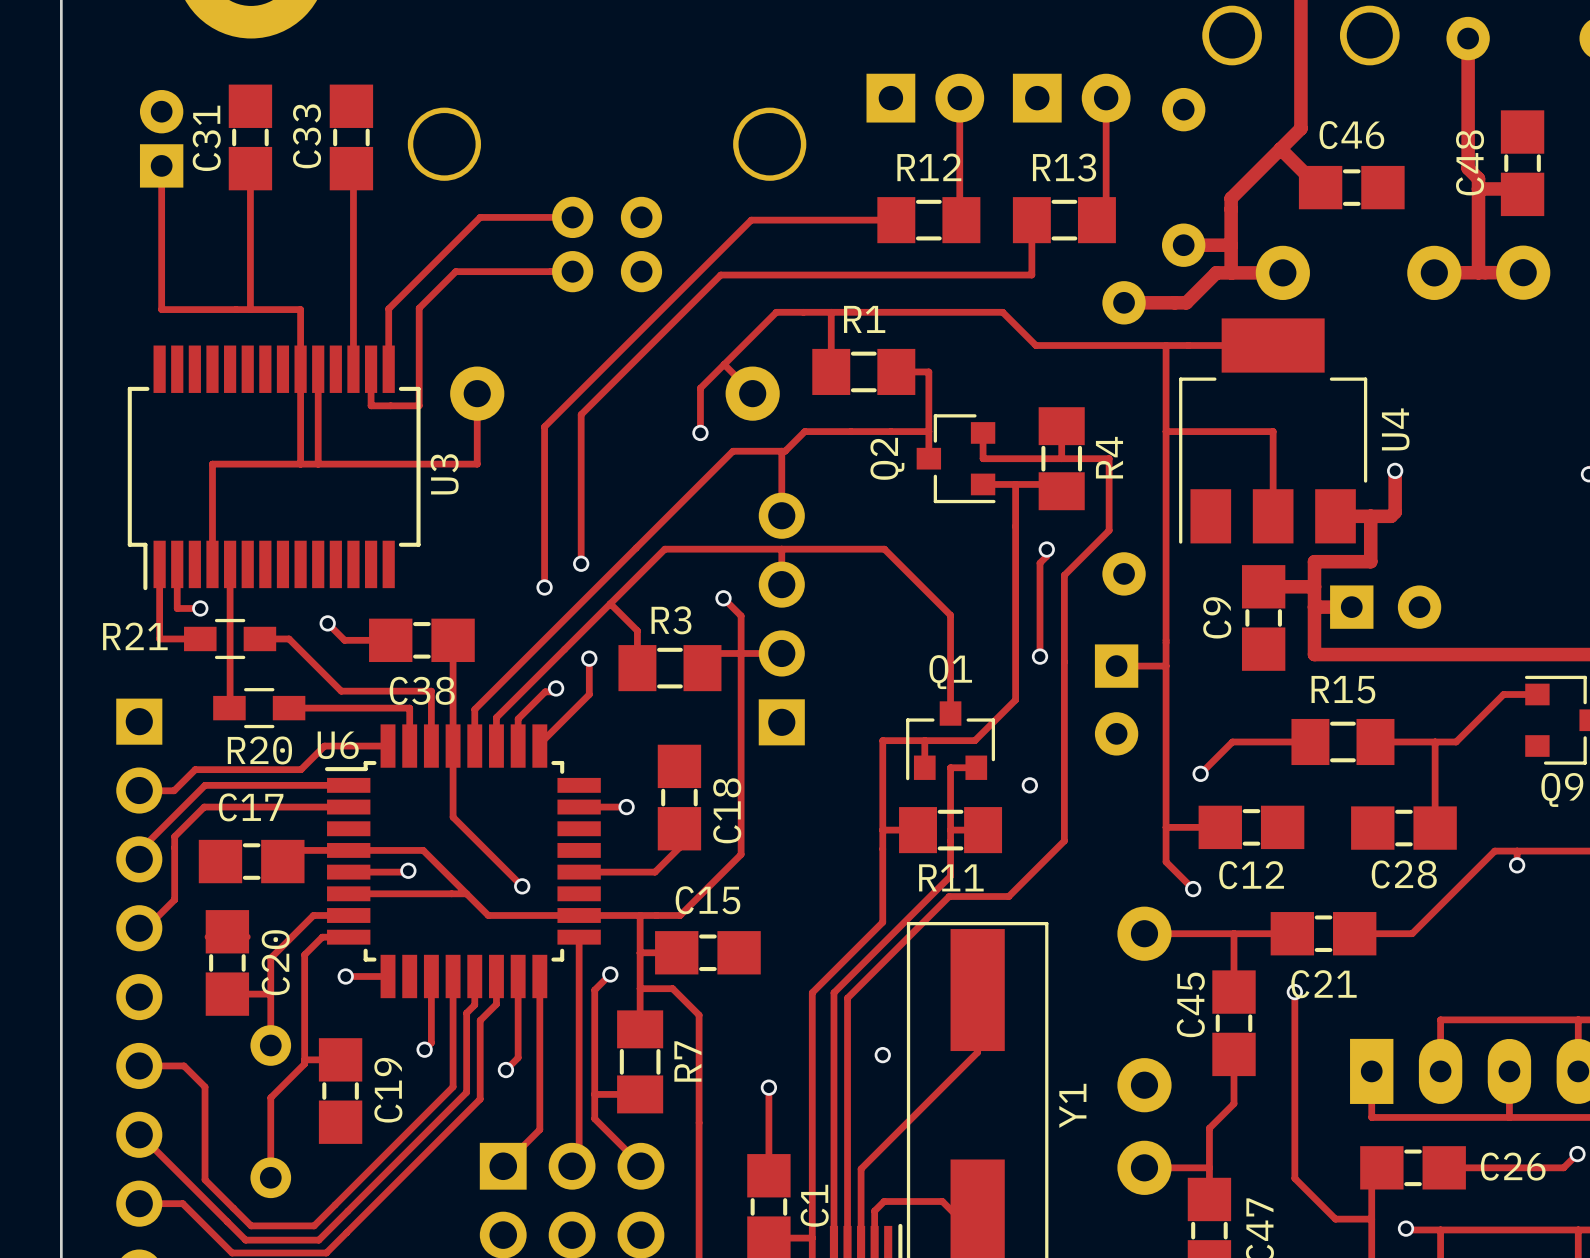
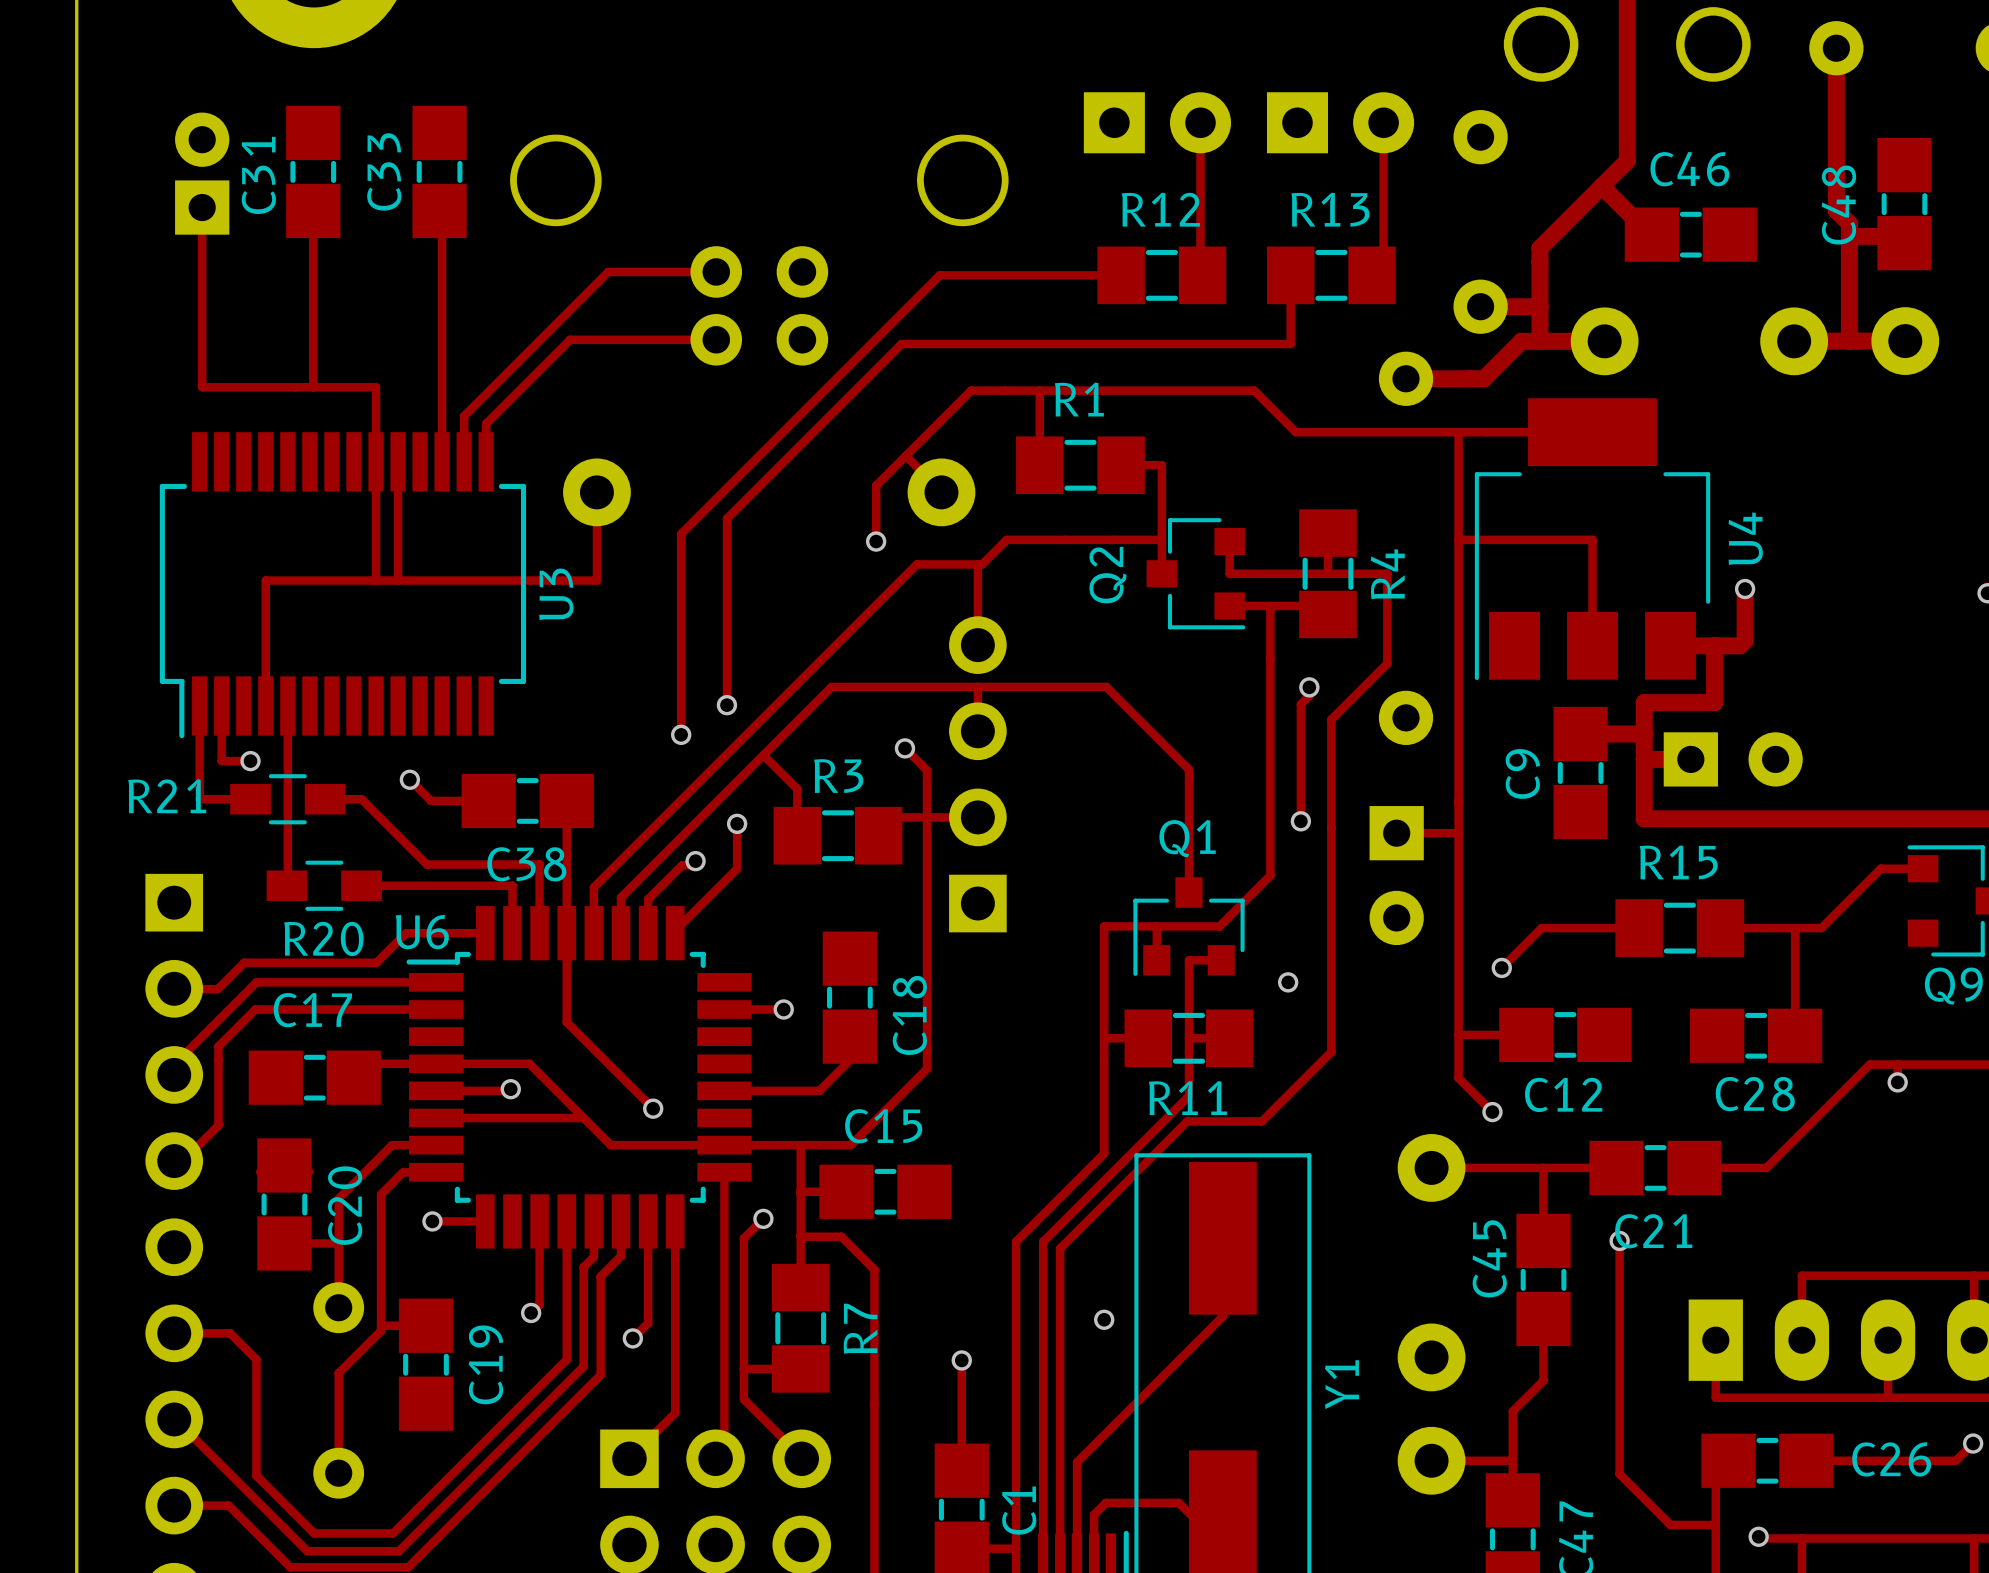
track: (486, 217) (480, 217) (388, 308) (388, 338) -> (608, 271) (464, 416) (464, 461)
track: (419, 308) (419, 405) (371, 405) (371, 369) -> (524, 385) (486, 423)

